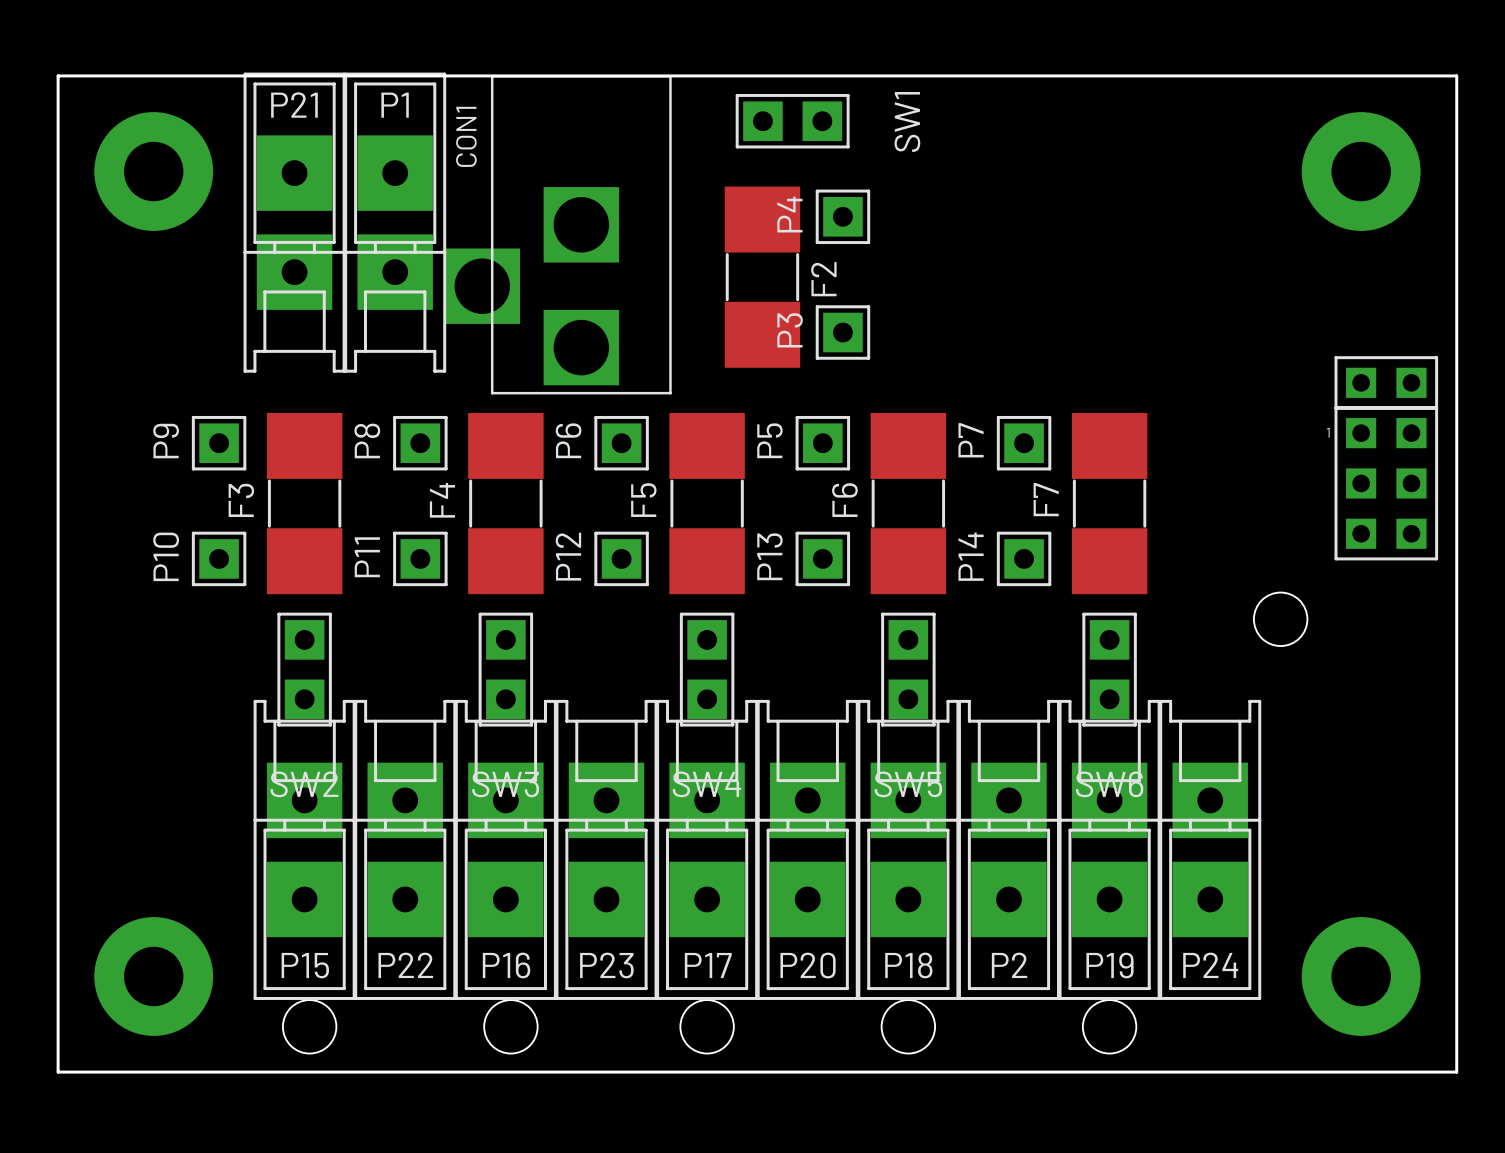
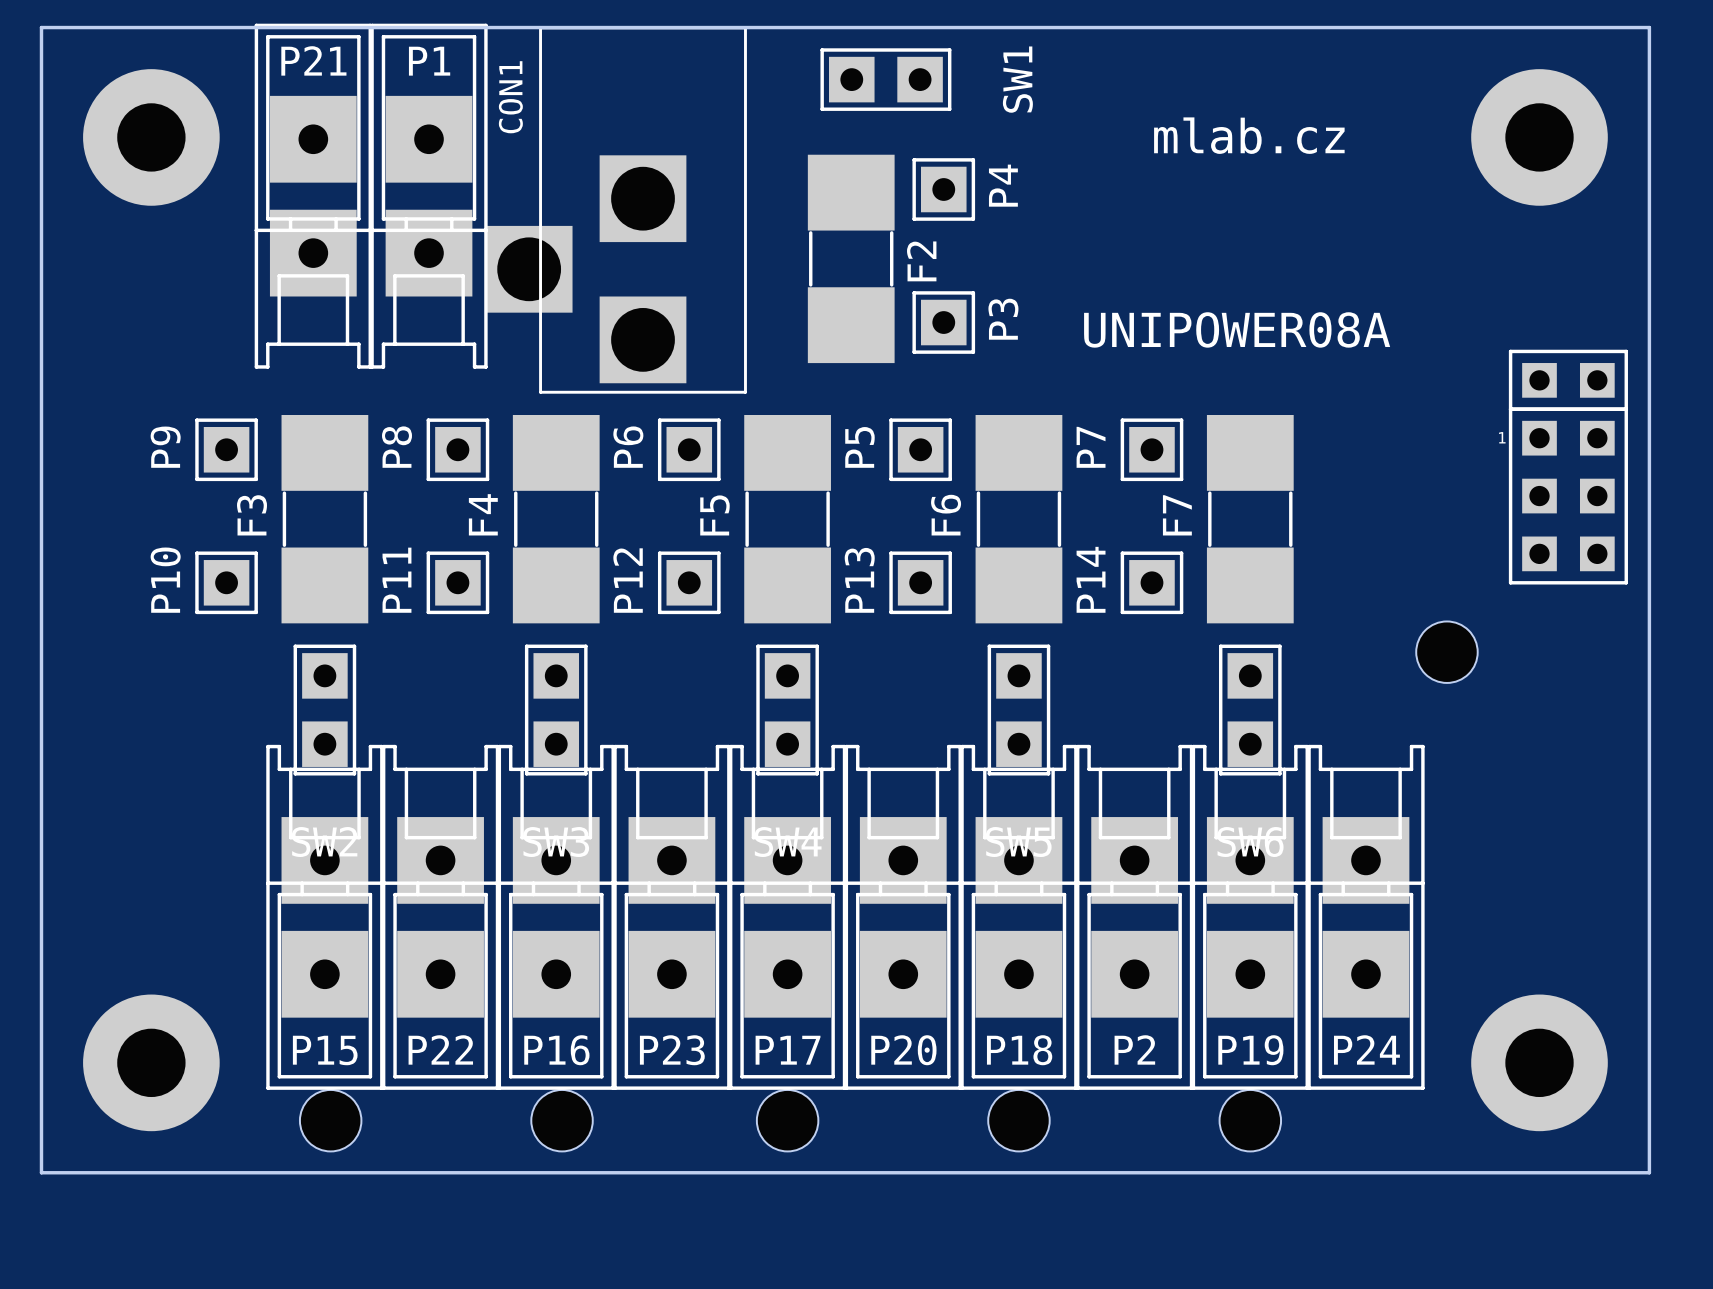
text: none -> mlab.cz (1249, 135)
P4 name position: P4 (789, 214) -> P4 (1003, 185)
P3 name position: P3 (790, 330) -> P3 (1003, 319)
text: none -> UNIPOWER08A (1237, 329)

